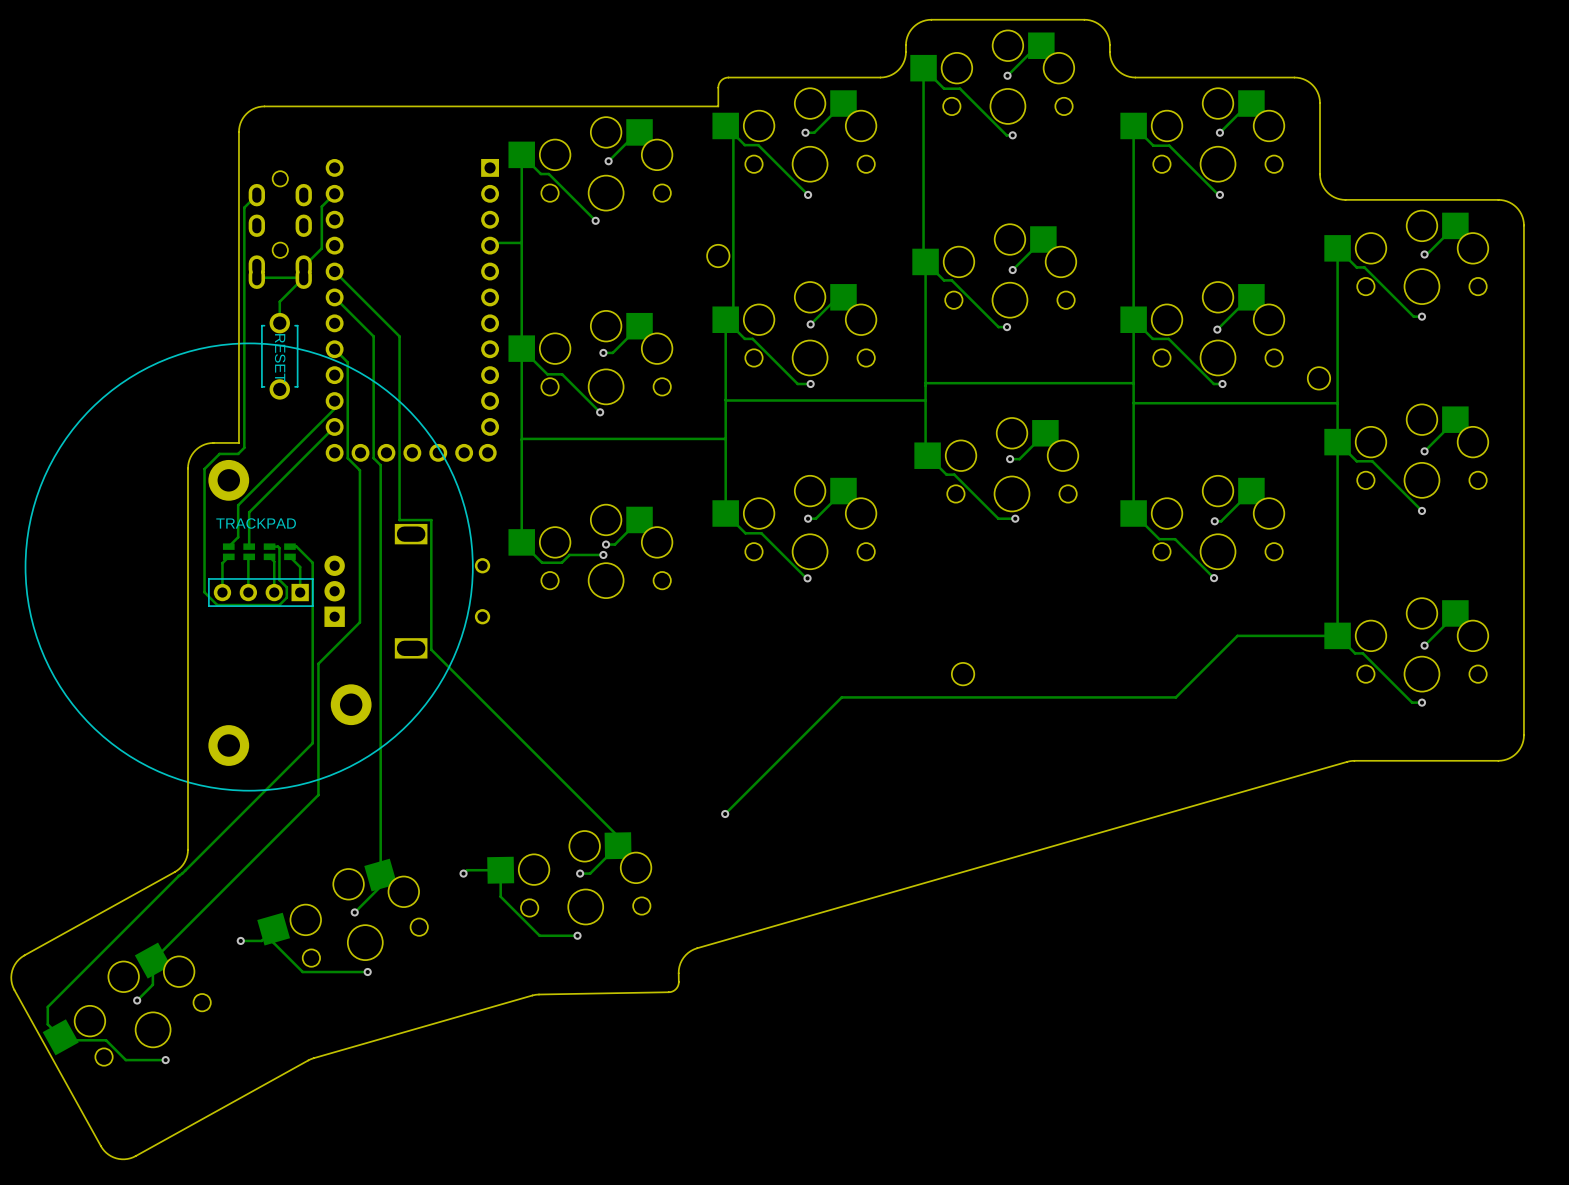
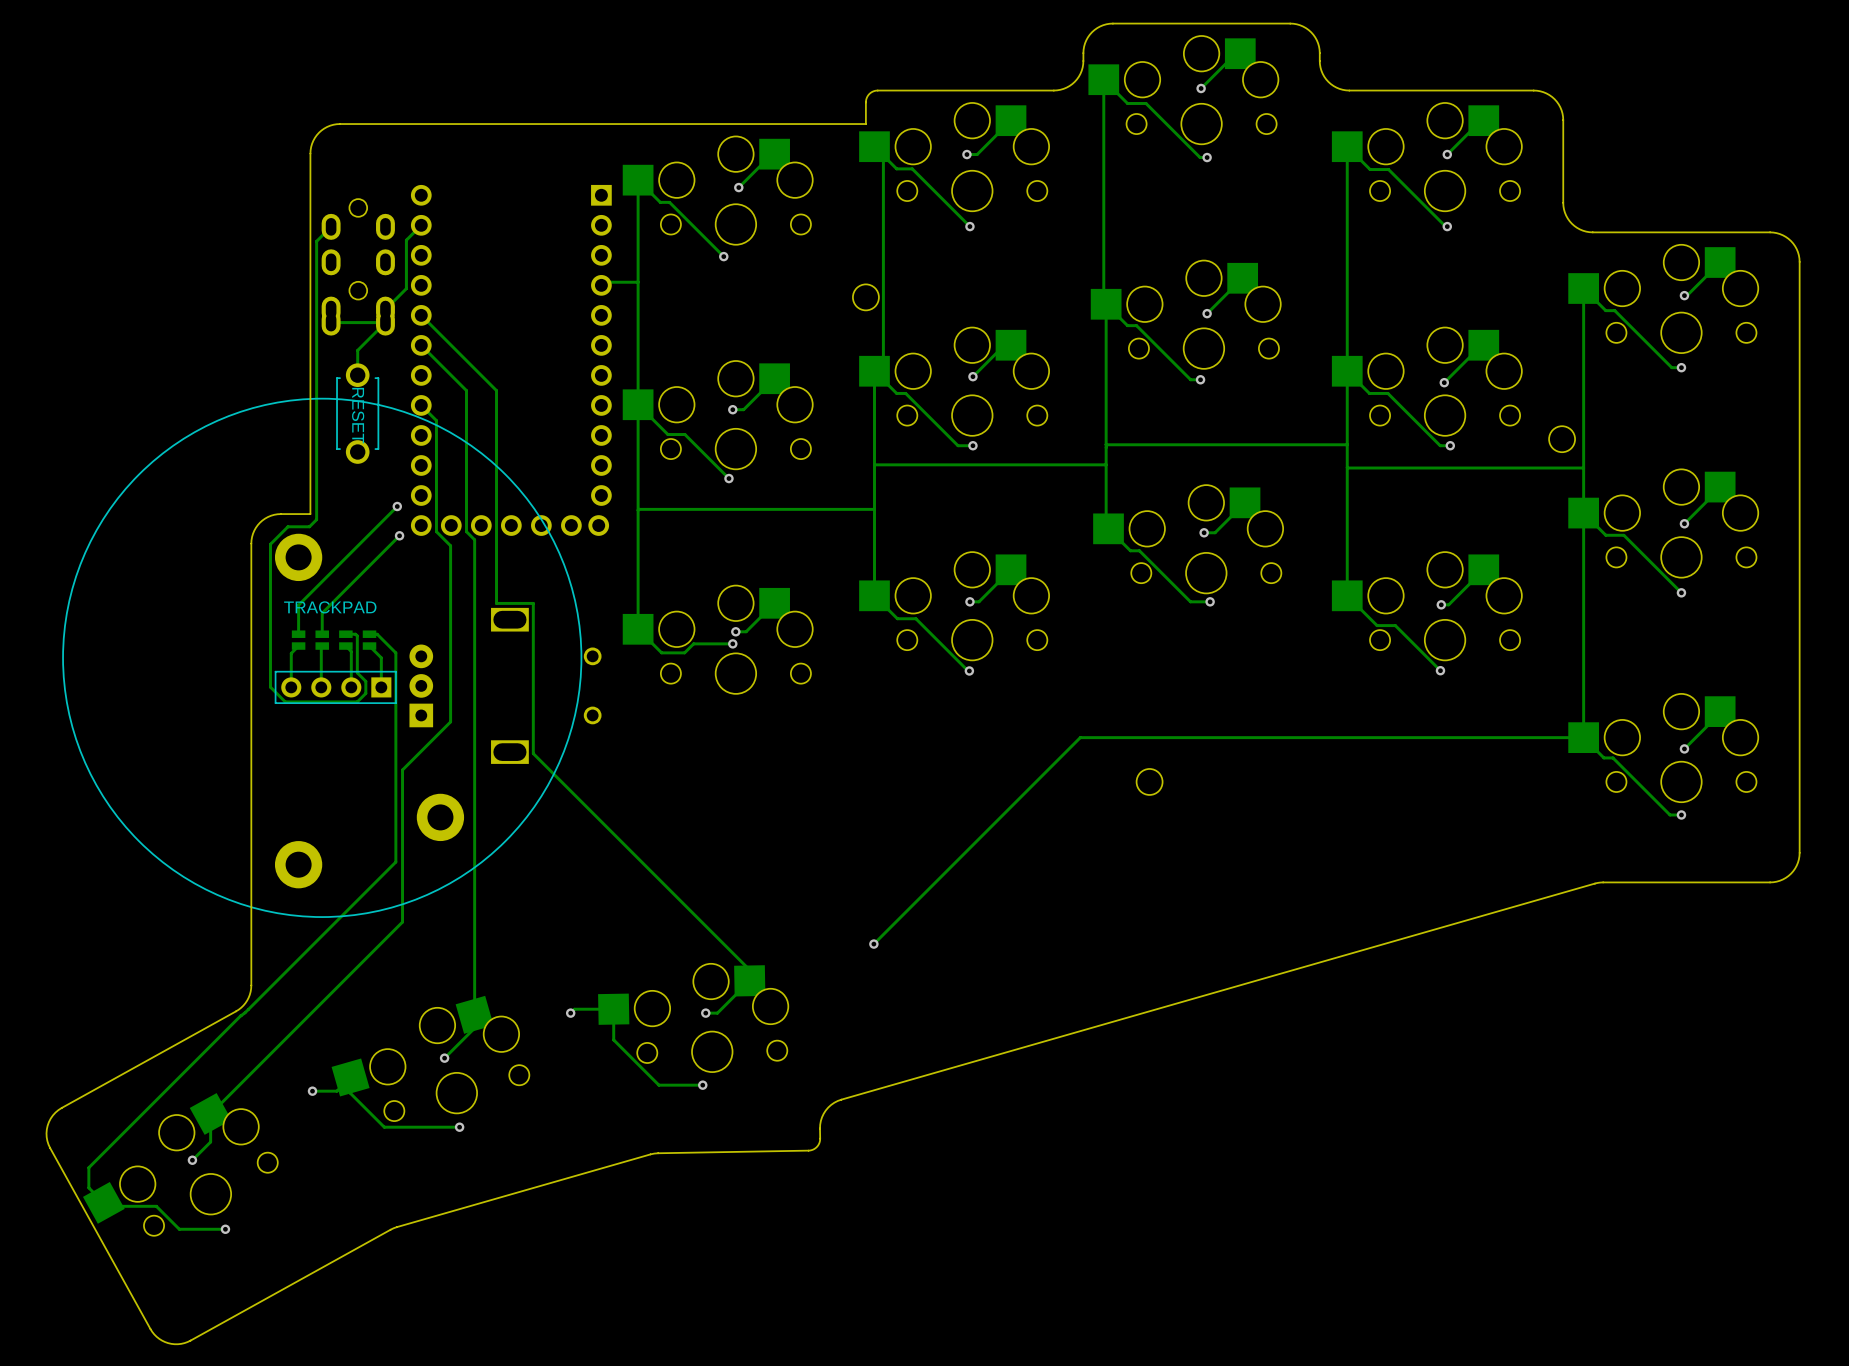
track: (334, 401) (334, 408) (238, 505) (238, 537) (228, 546) -> (397, 506) (298, 605) (298, 634)
track: (334, 426) (249, 512) (249, 528) -> (399, 535) (322, 613)
via: none -> (397, 506)
via: none -> (399, 535)
track: (1237, 635) (1175, 697) (841, 697) -> (1467, 737) (1080, 737) (1008, 808)

